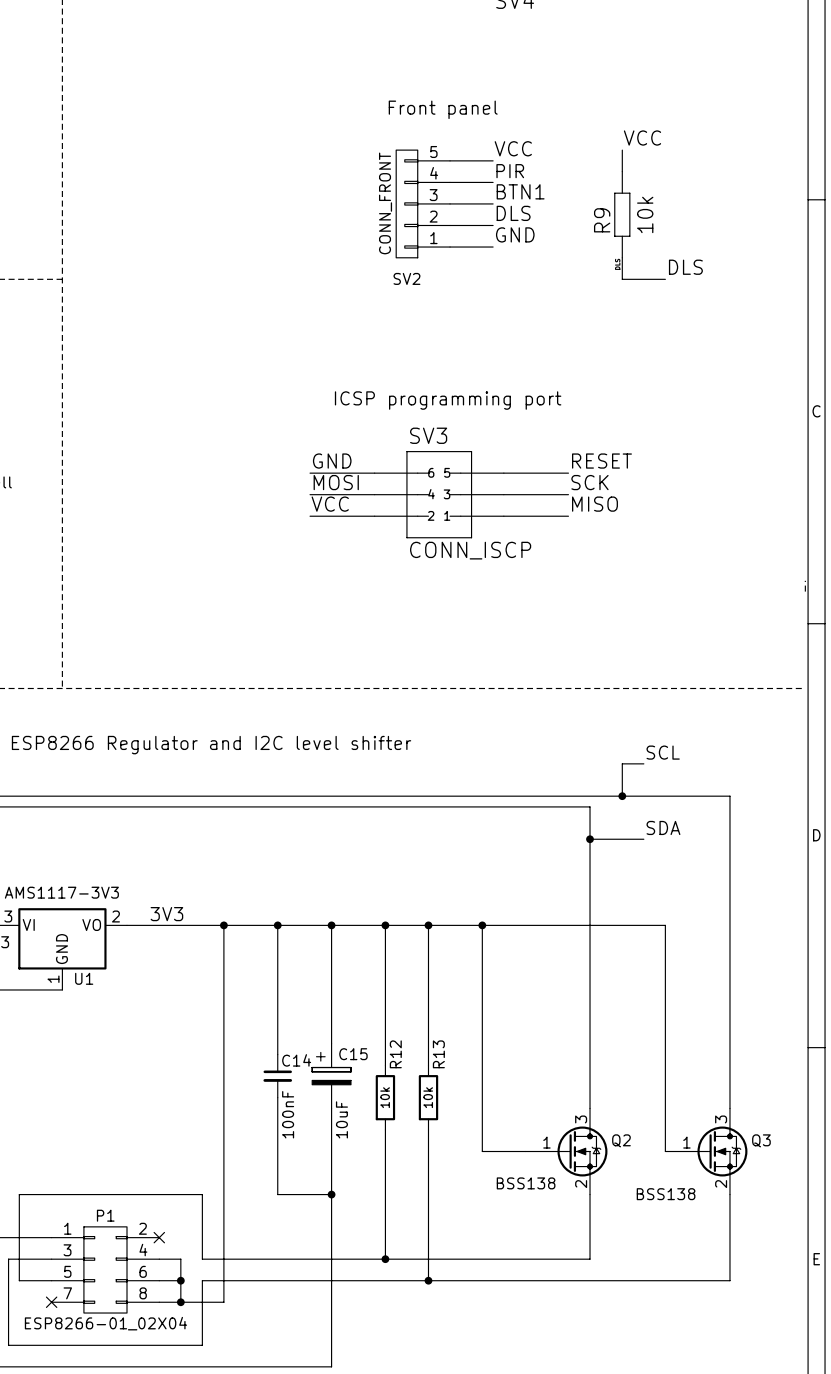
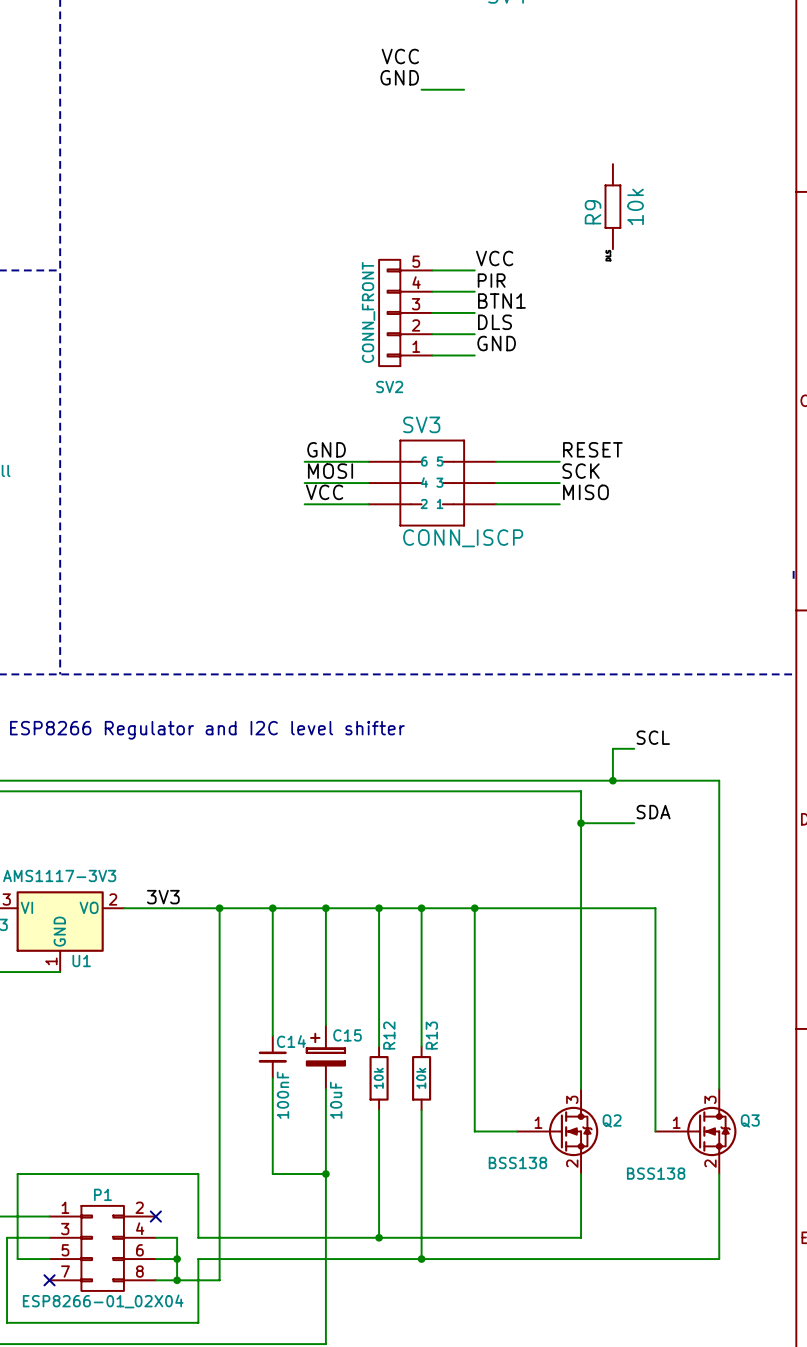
label: none -> VCC (400, 56)
label: none -> GND (399, 77)
wire: none -> (421, 89) (464, 89)
text: Front panel (443, 109) -> none
label: VCC (642, 138) -> none
label: VCC (513, 148) -> none
wire: (622, 150) (622, 171) -> none
wire: (450, 160) (493, 160) -> (432, 270) (474, 270)
label position: PIR (510, 171) -> PIR (491, 280)
wire: (450, 182) (493, 182) -> (432, 291) (474, 291)
label position: BTN1 (520, 191) -> BTN1 (501, 301)
SV2 position: (423, 203) -> (405, 312)
wire: (450, 203) (493, 203) -> (432, 312) (474, 312)
label: DLS (513, 213) -> none
wire: (450, 225) (493, 225) -> (432, 334) (474, 334)
label: GND (515, 234) -> none
wire: (450, 247) (493, 247) -> (432, 355) (474, 355)
wire: (622, 257) (622, 279) (665, 279) -> none
label: none -> VCC (494, 258)
label: DLS (685, 267) -> none
label: none -> DLS (494, 322)
label: none -> GND (496, 343)
text: ICSP programming port (448, 400) -> none

